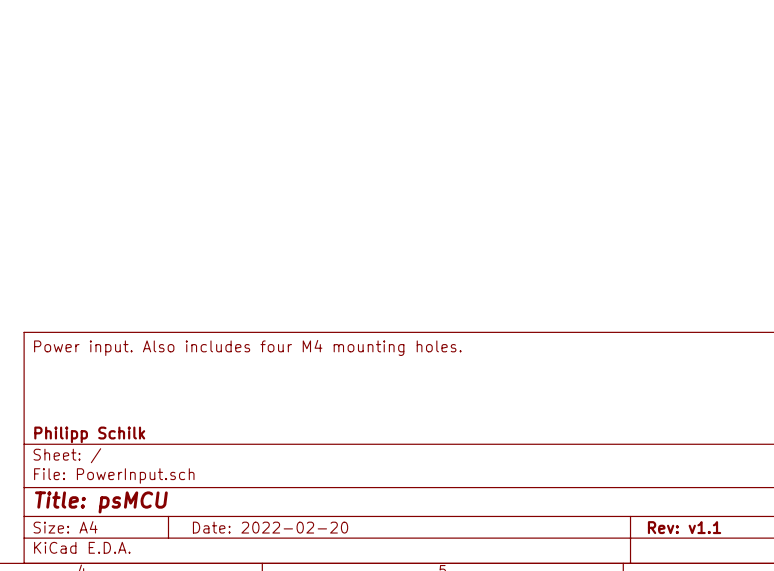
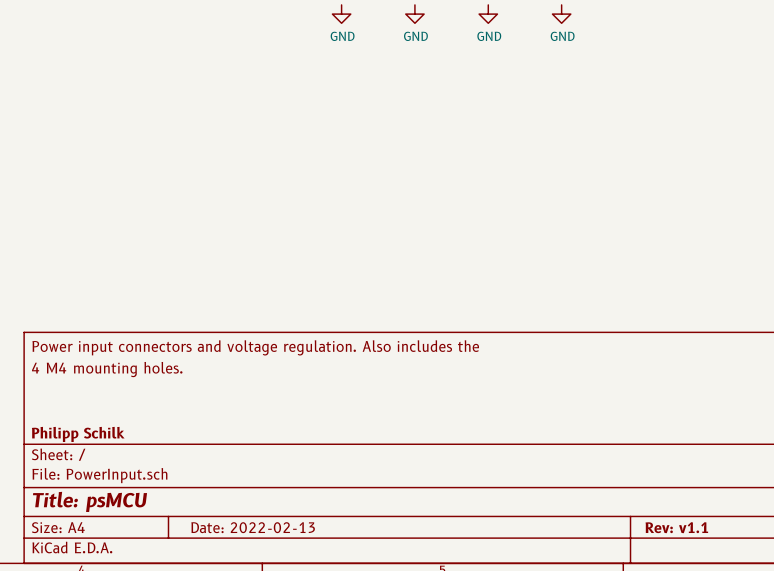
power symbol: none -> GND (341, 14)
power symbol: none -> GND (414, 14)
power symbol: none -> GND (488, 14)
power symbol: none -> GND (561, 14)
title block: Power input. Also includes four M4 mounting holes. (247, 347) -> Power input connectors and voltage regulation. Also includes the (255, 347)
title block: none -> 4 M4 mounting holes. (107, 369)
title block: Date: 2022-02-20 (270, 527) -> Date: 2022-02-13 (253, 527)

